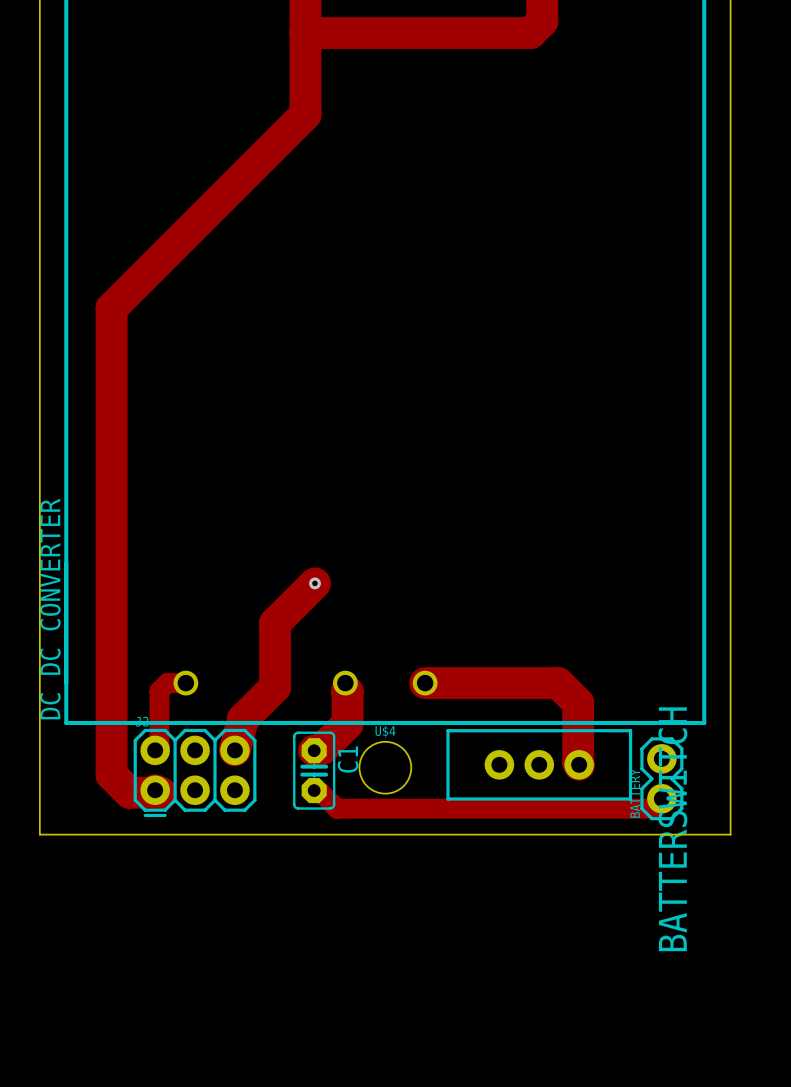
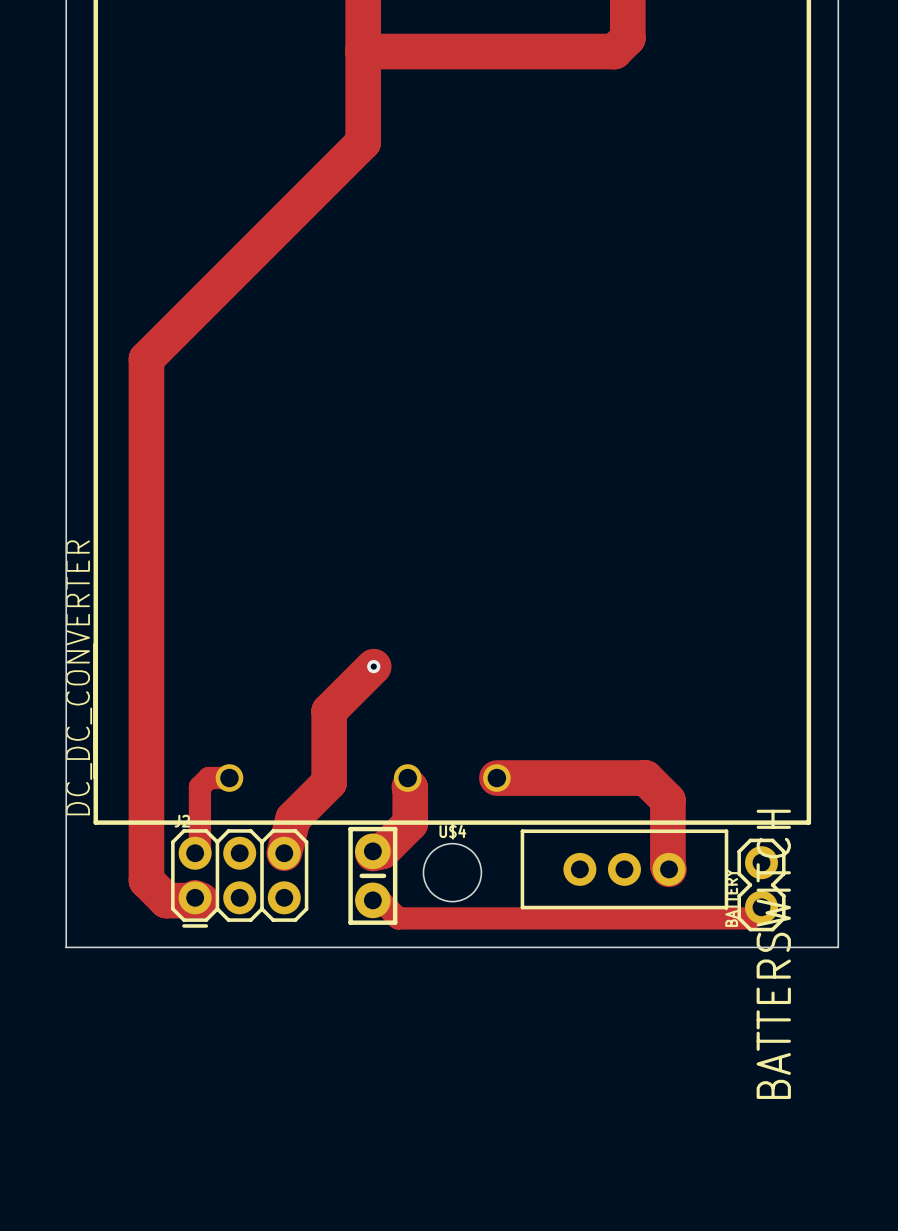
C1: (314, 770) -> none
part: none -> (372, 875)

